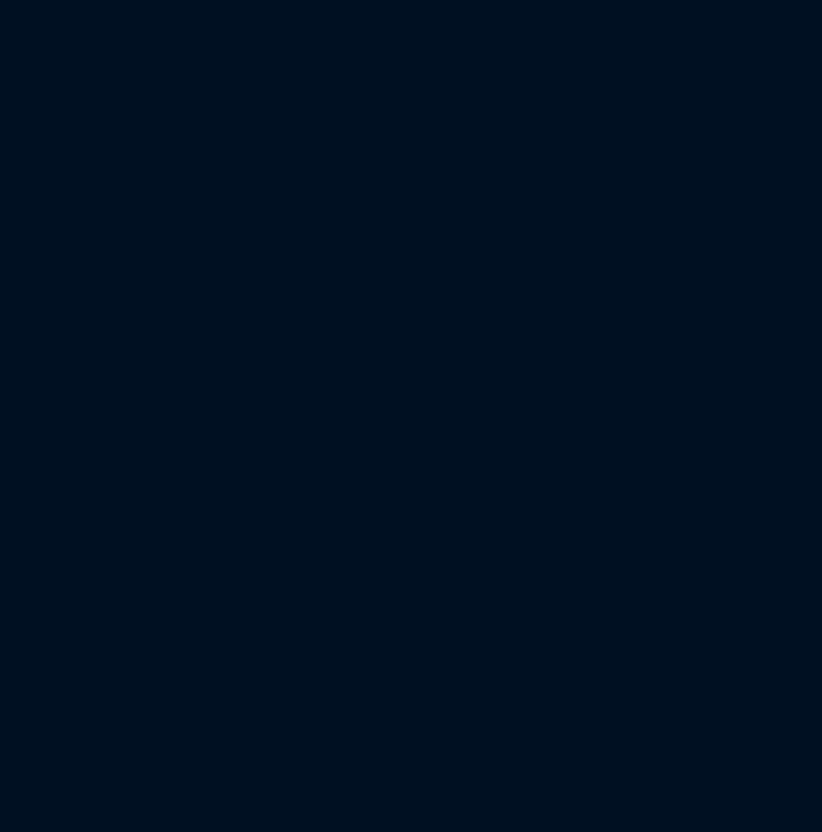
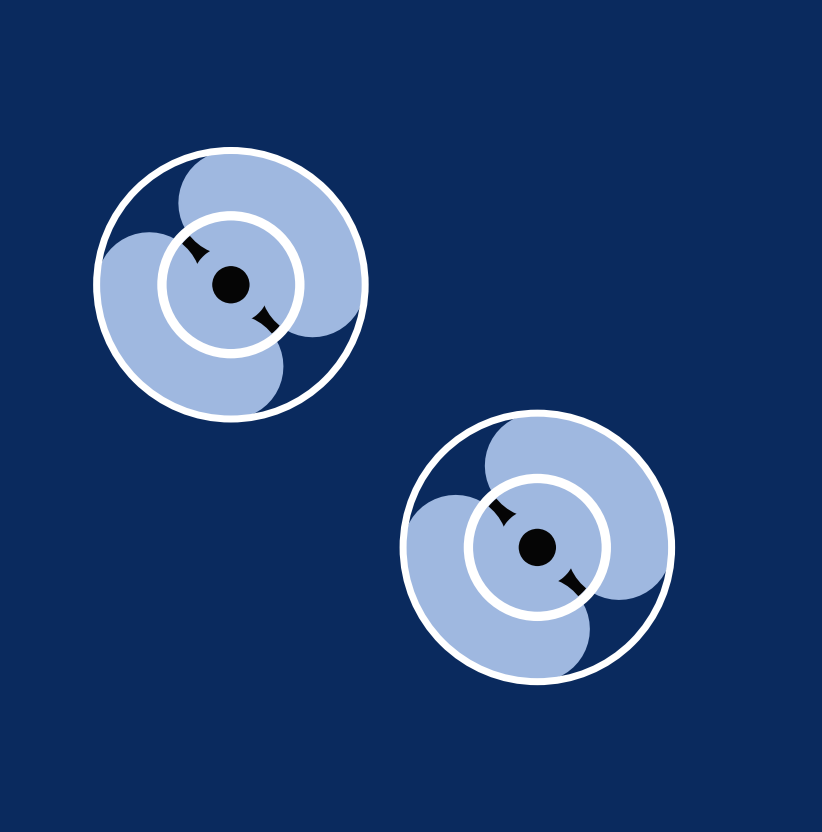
part: none -> (230, 284)
part: none -> (537, 547)

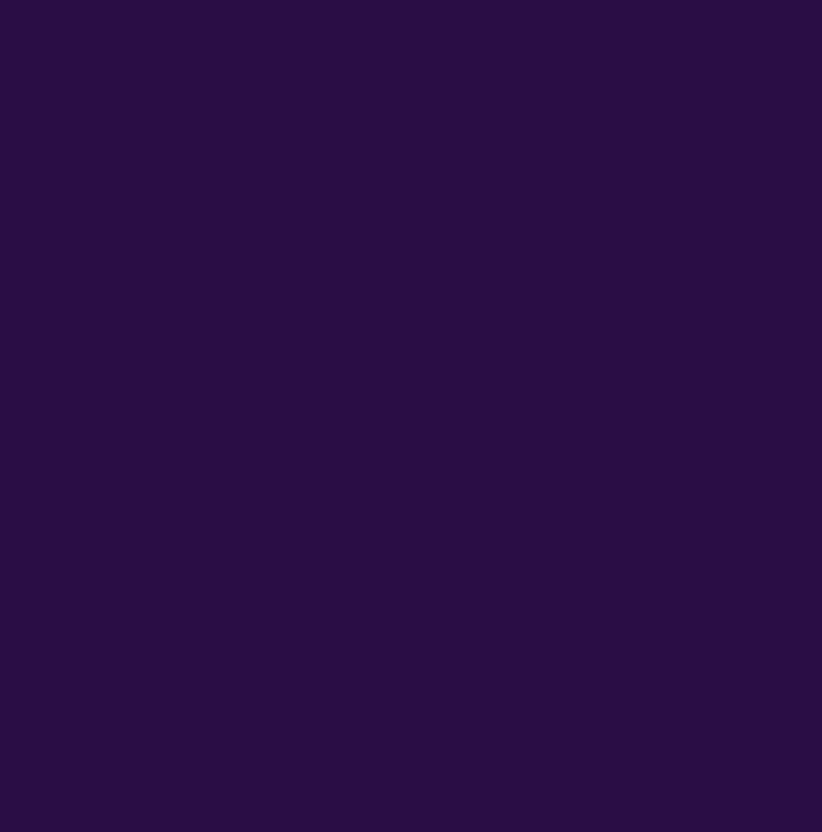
part: (230, 284) -> none
part: (537, 547) -> none

